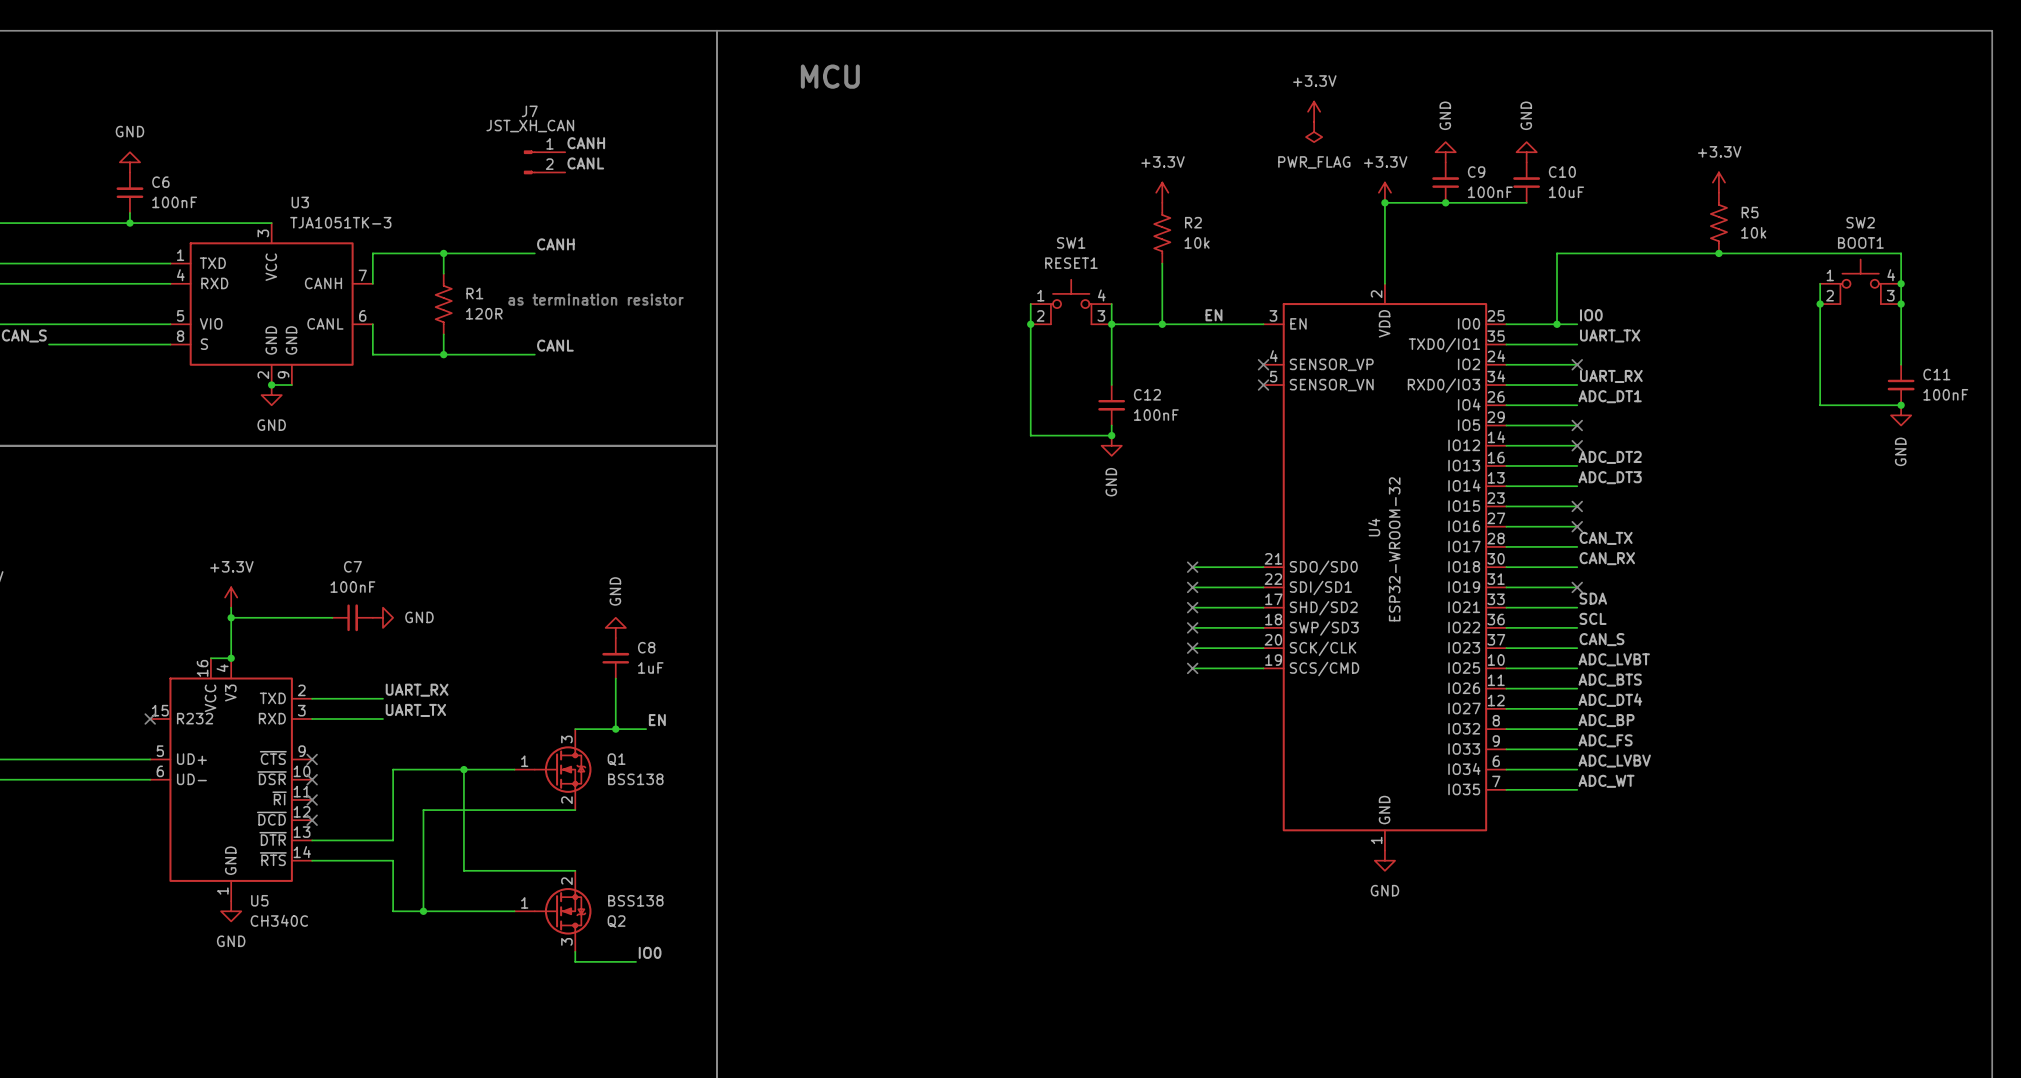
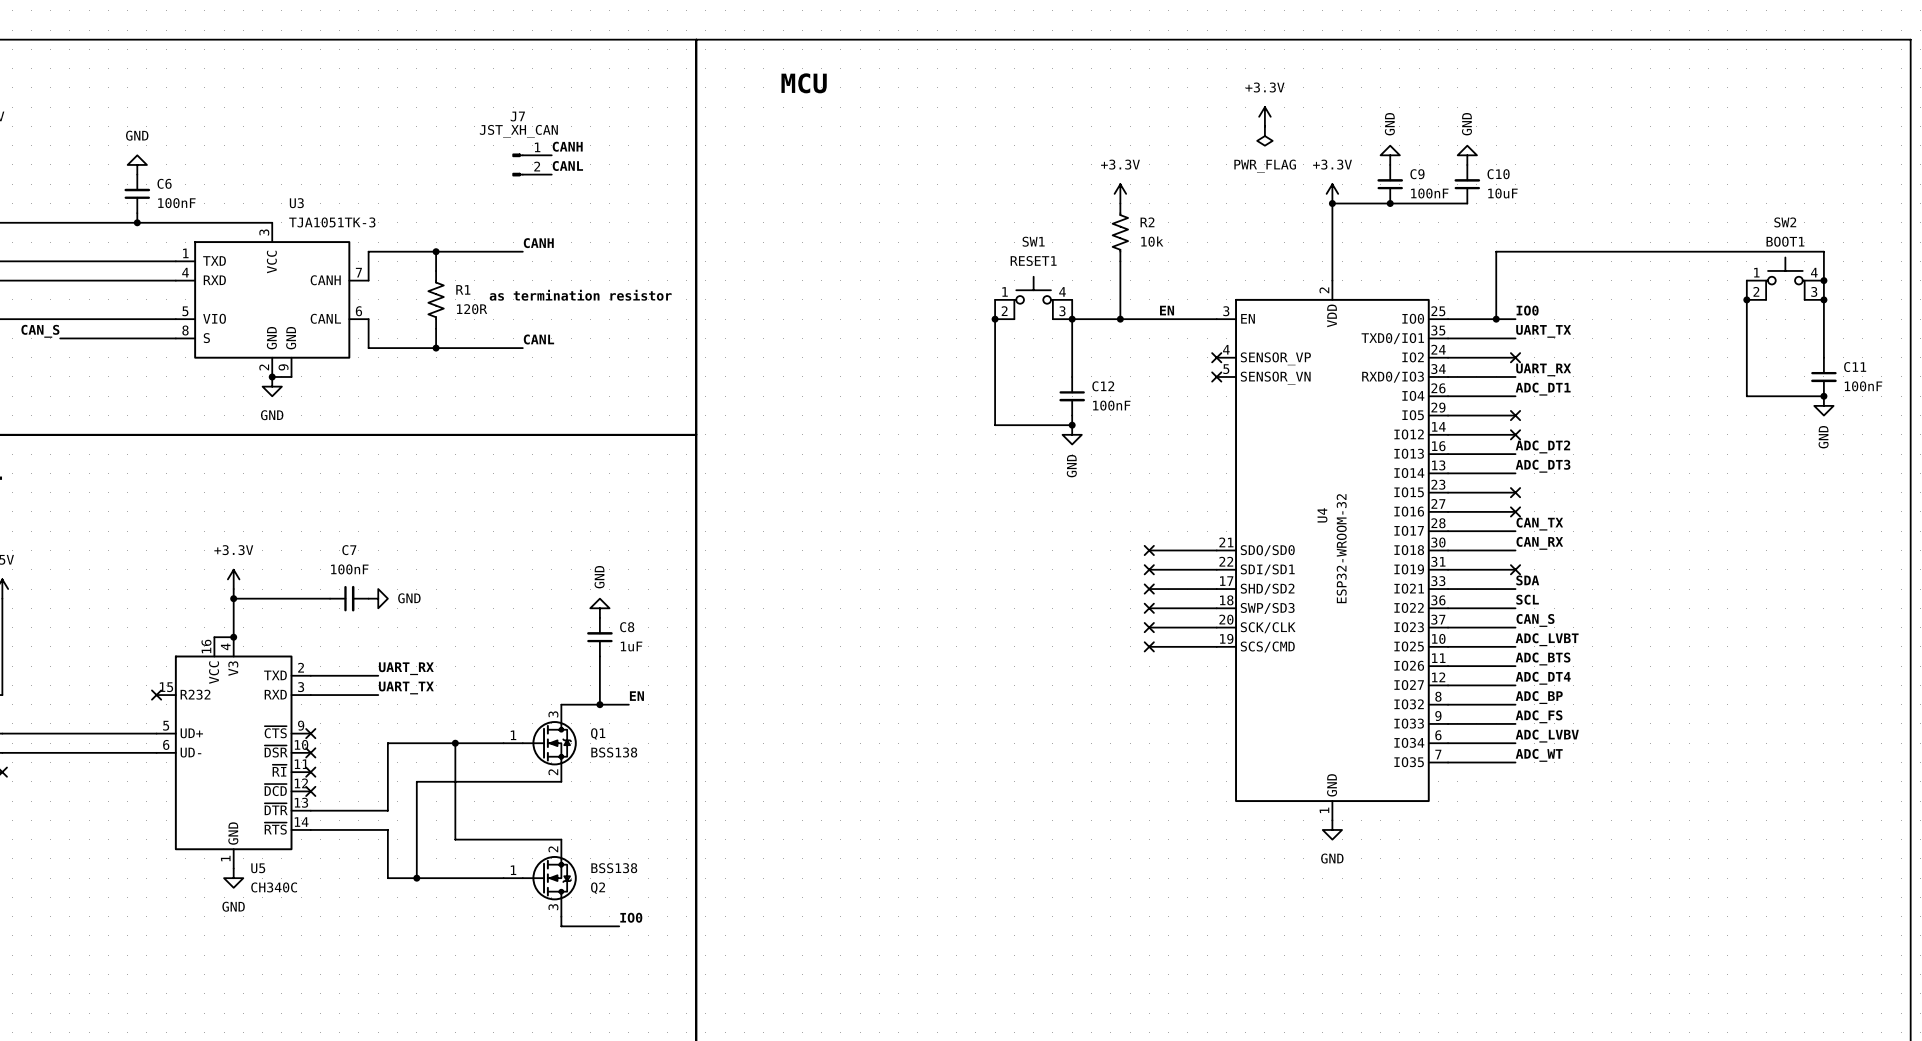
power symbol: +3.3V (1718, 182) -> none
R5: 10k (1718, 223) -> none
junction: (1718, 253) -> none

